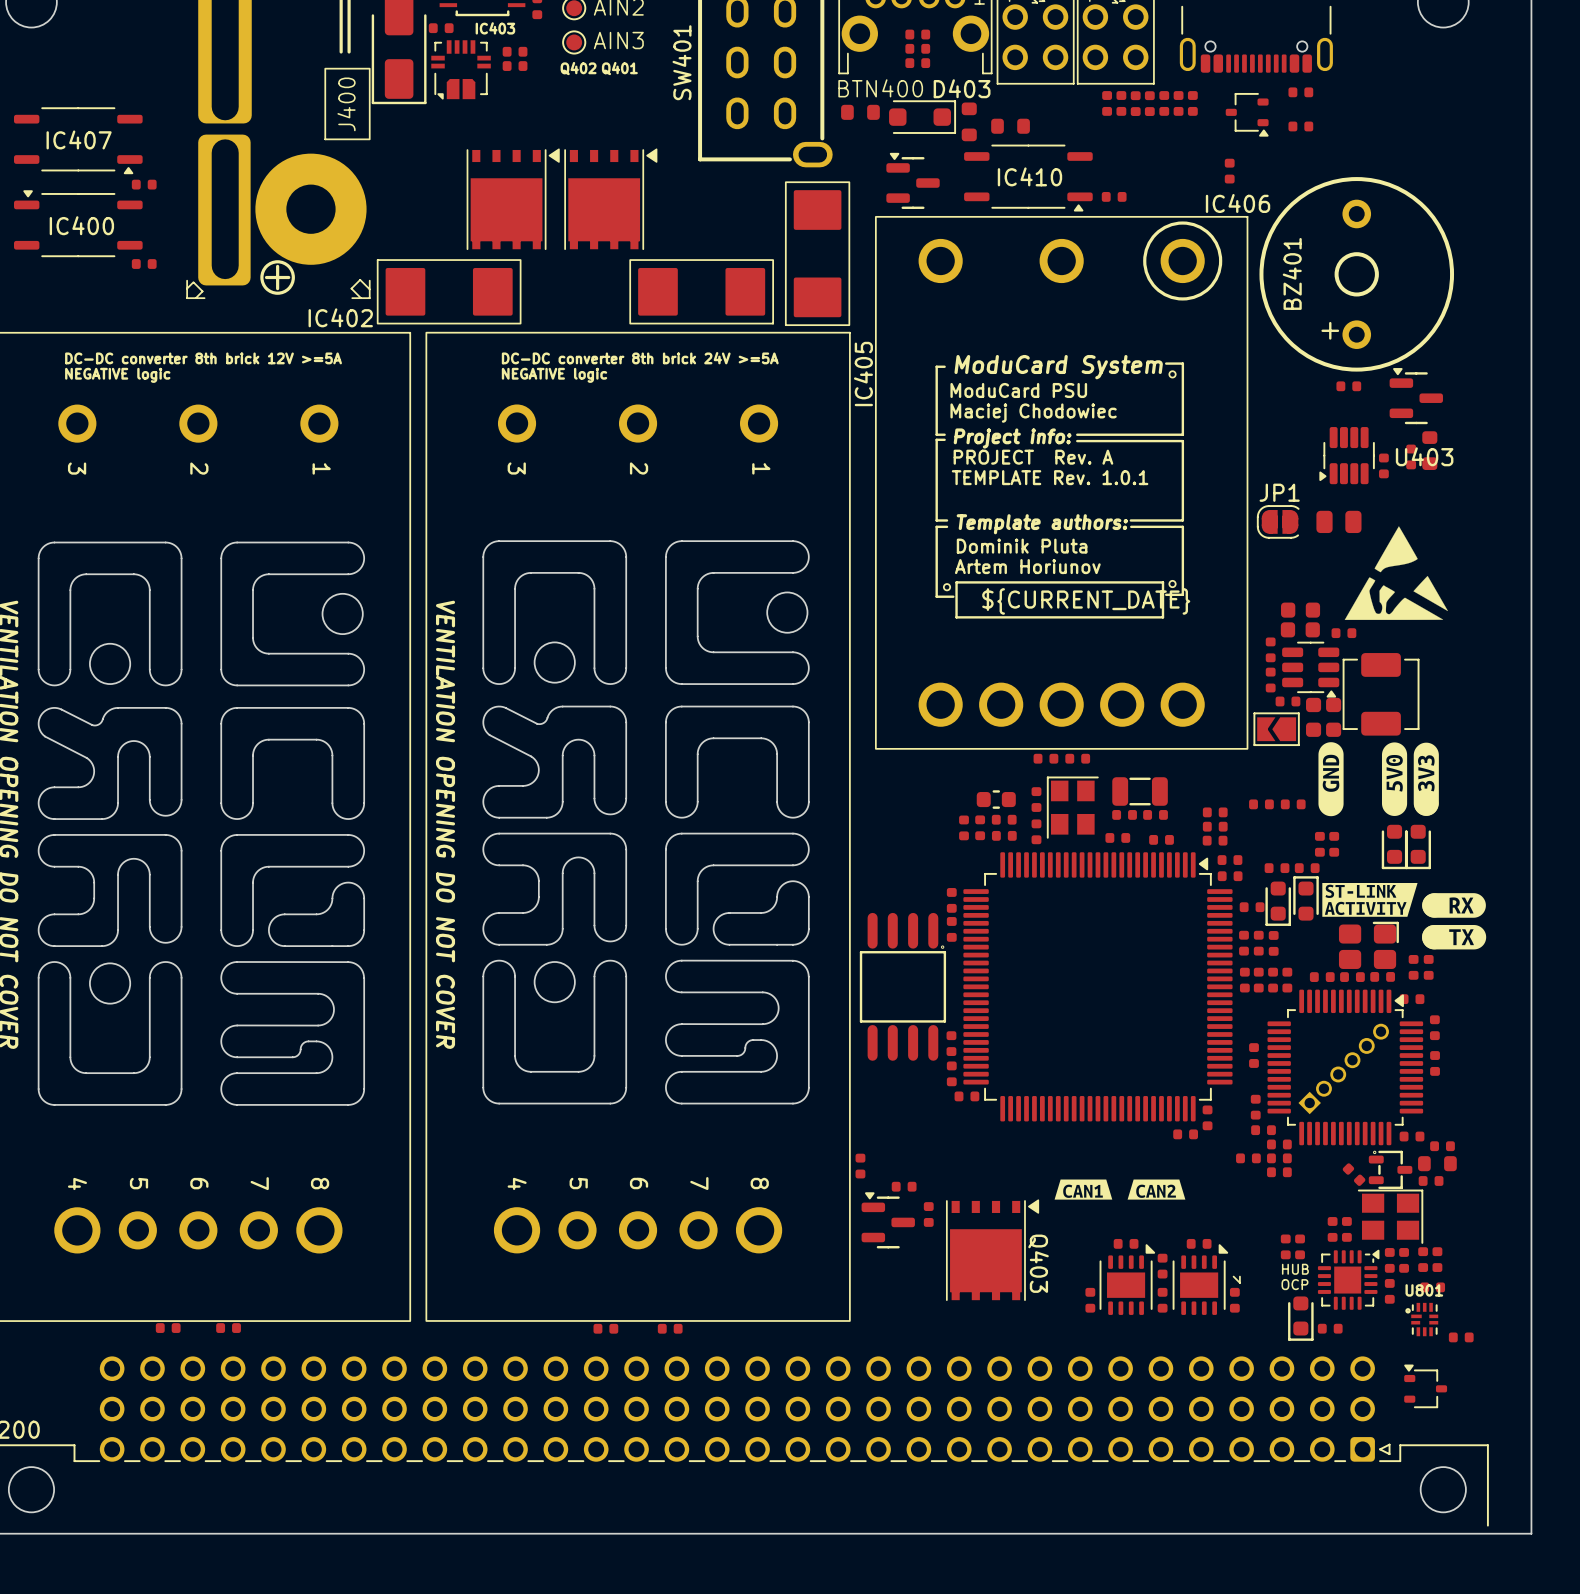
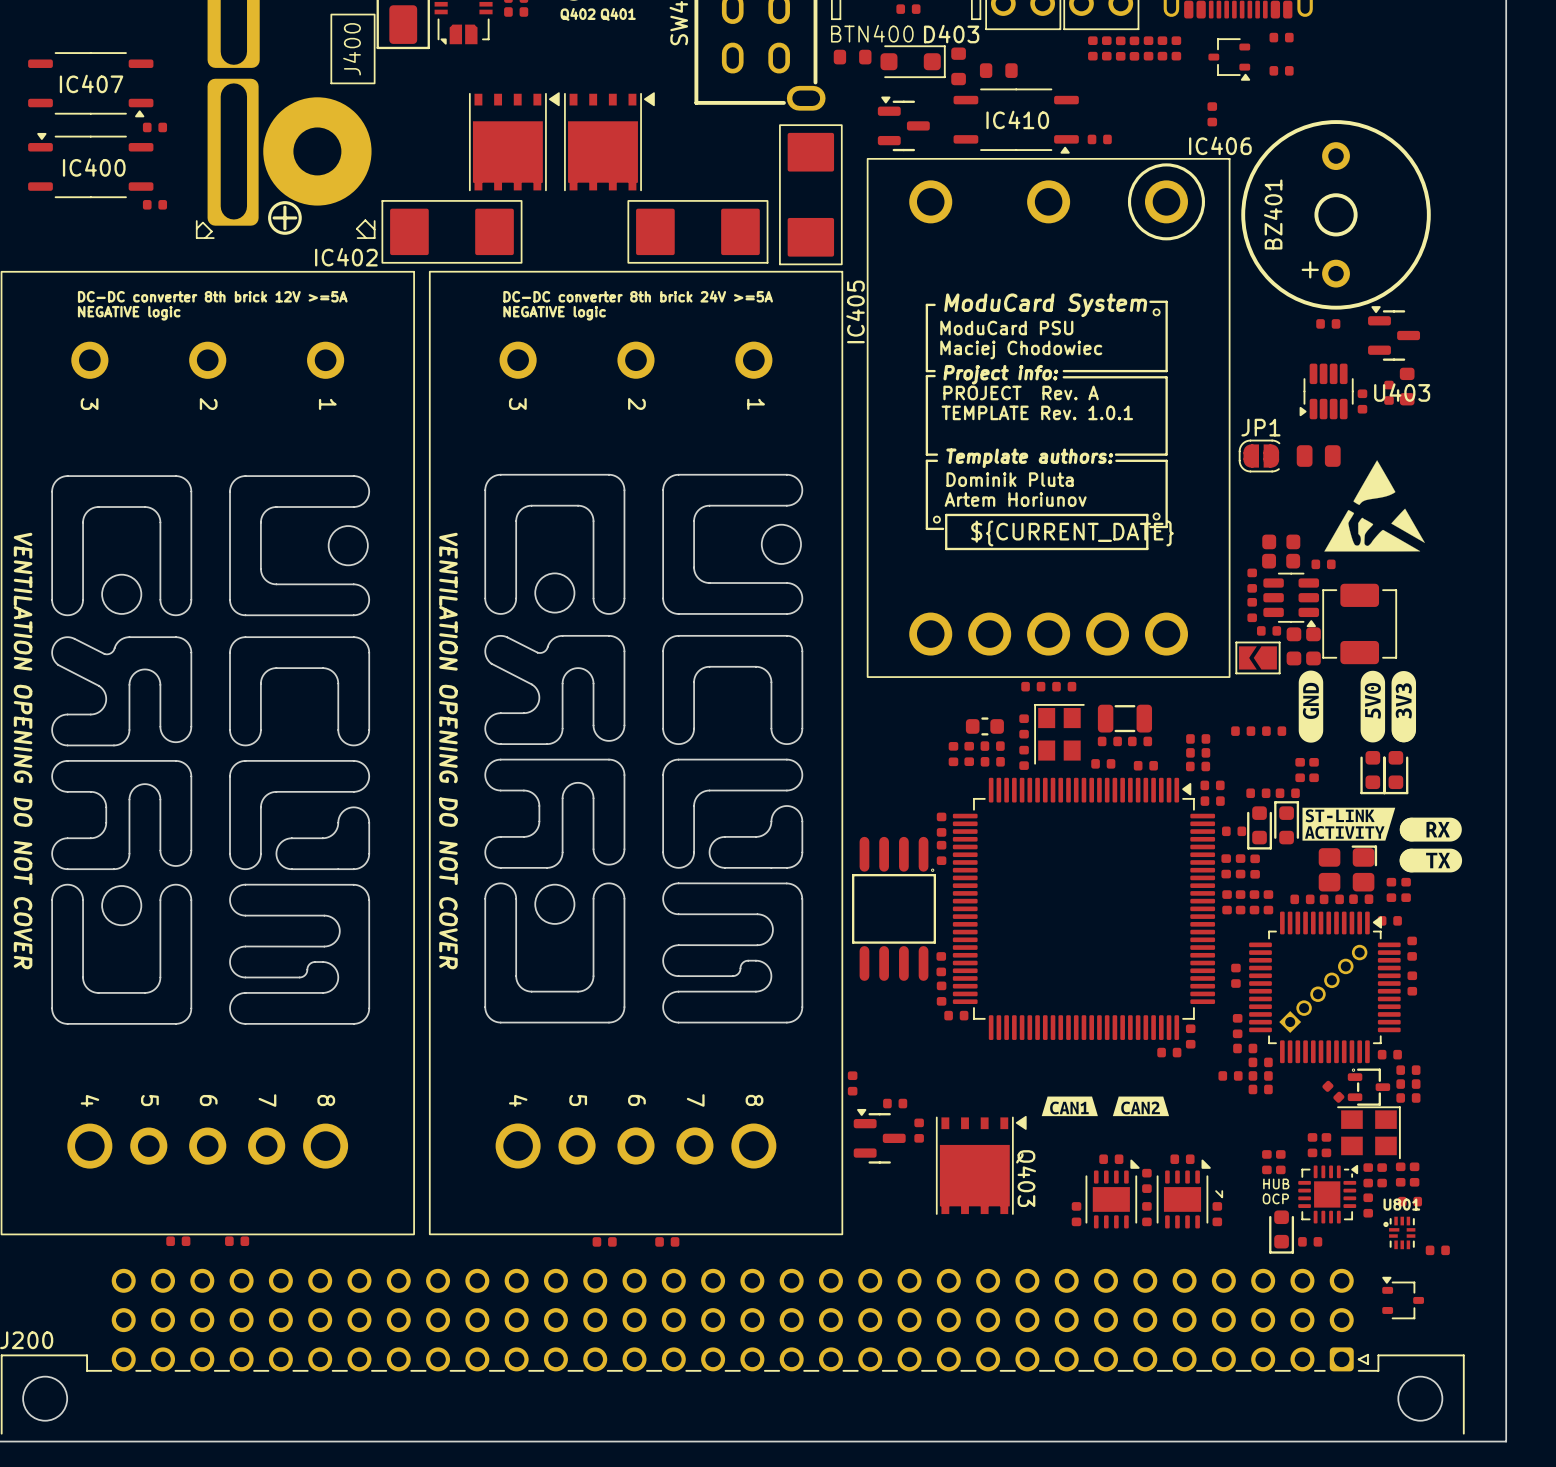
part: (1442, 1146) -> none
part: none -> (1408, 1070)
part: (1437, 1163) -> none
part: none -> (1408, 1084)

